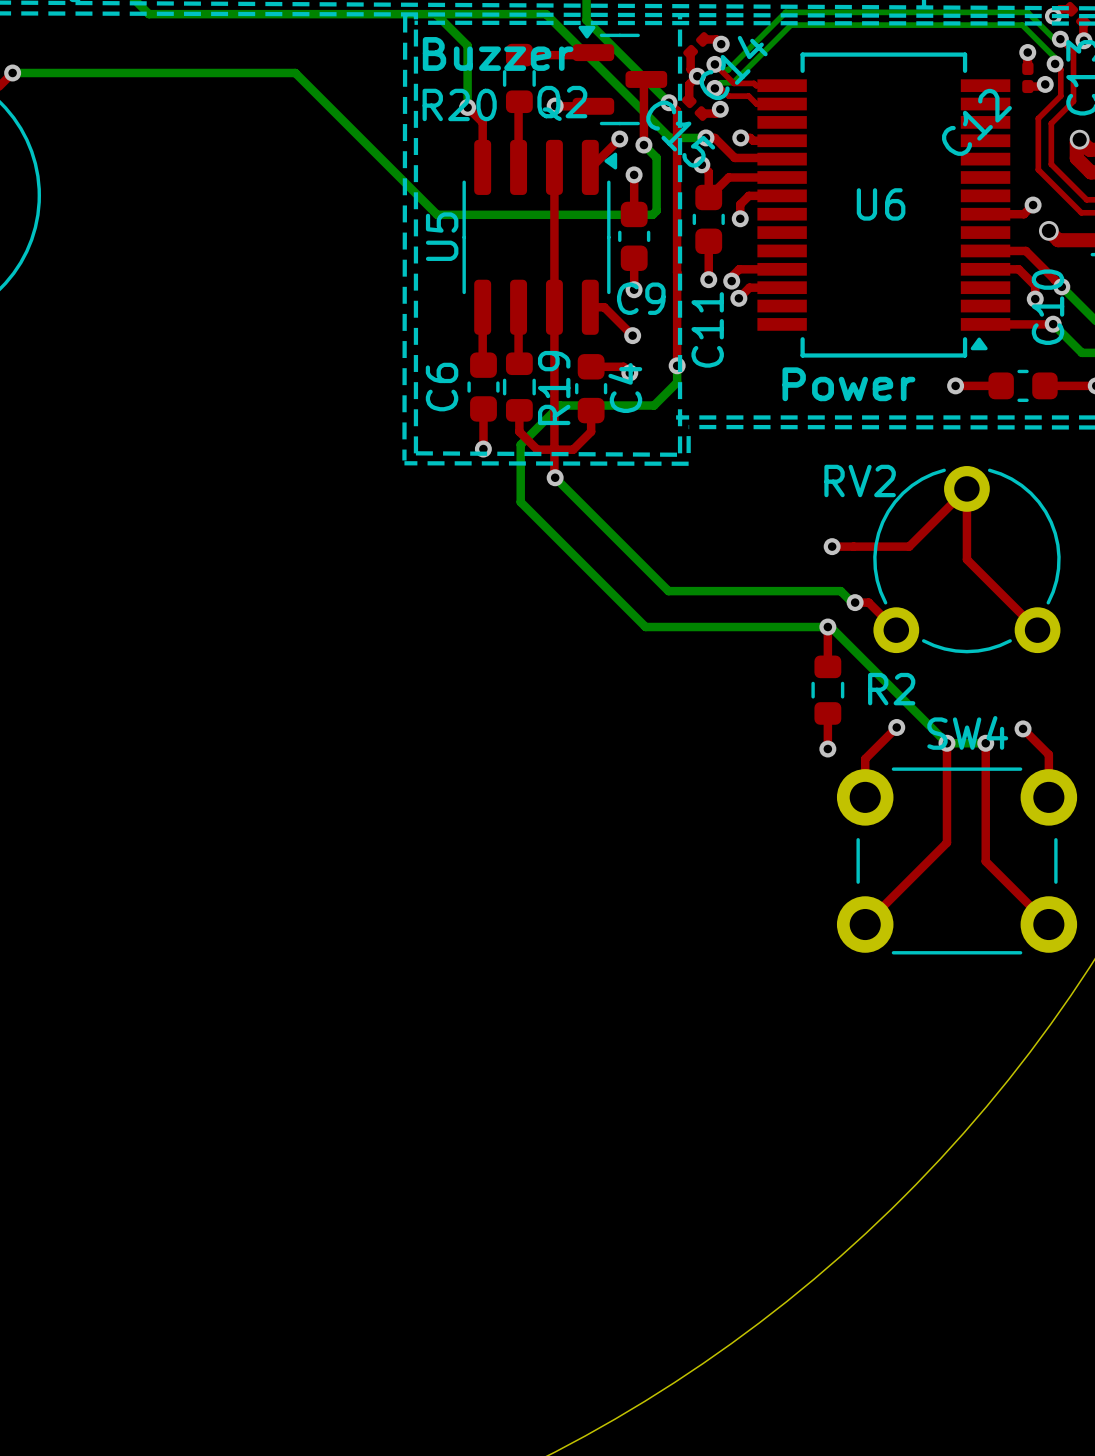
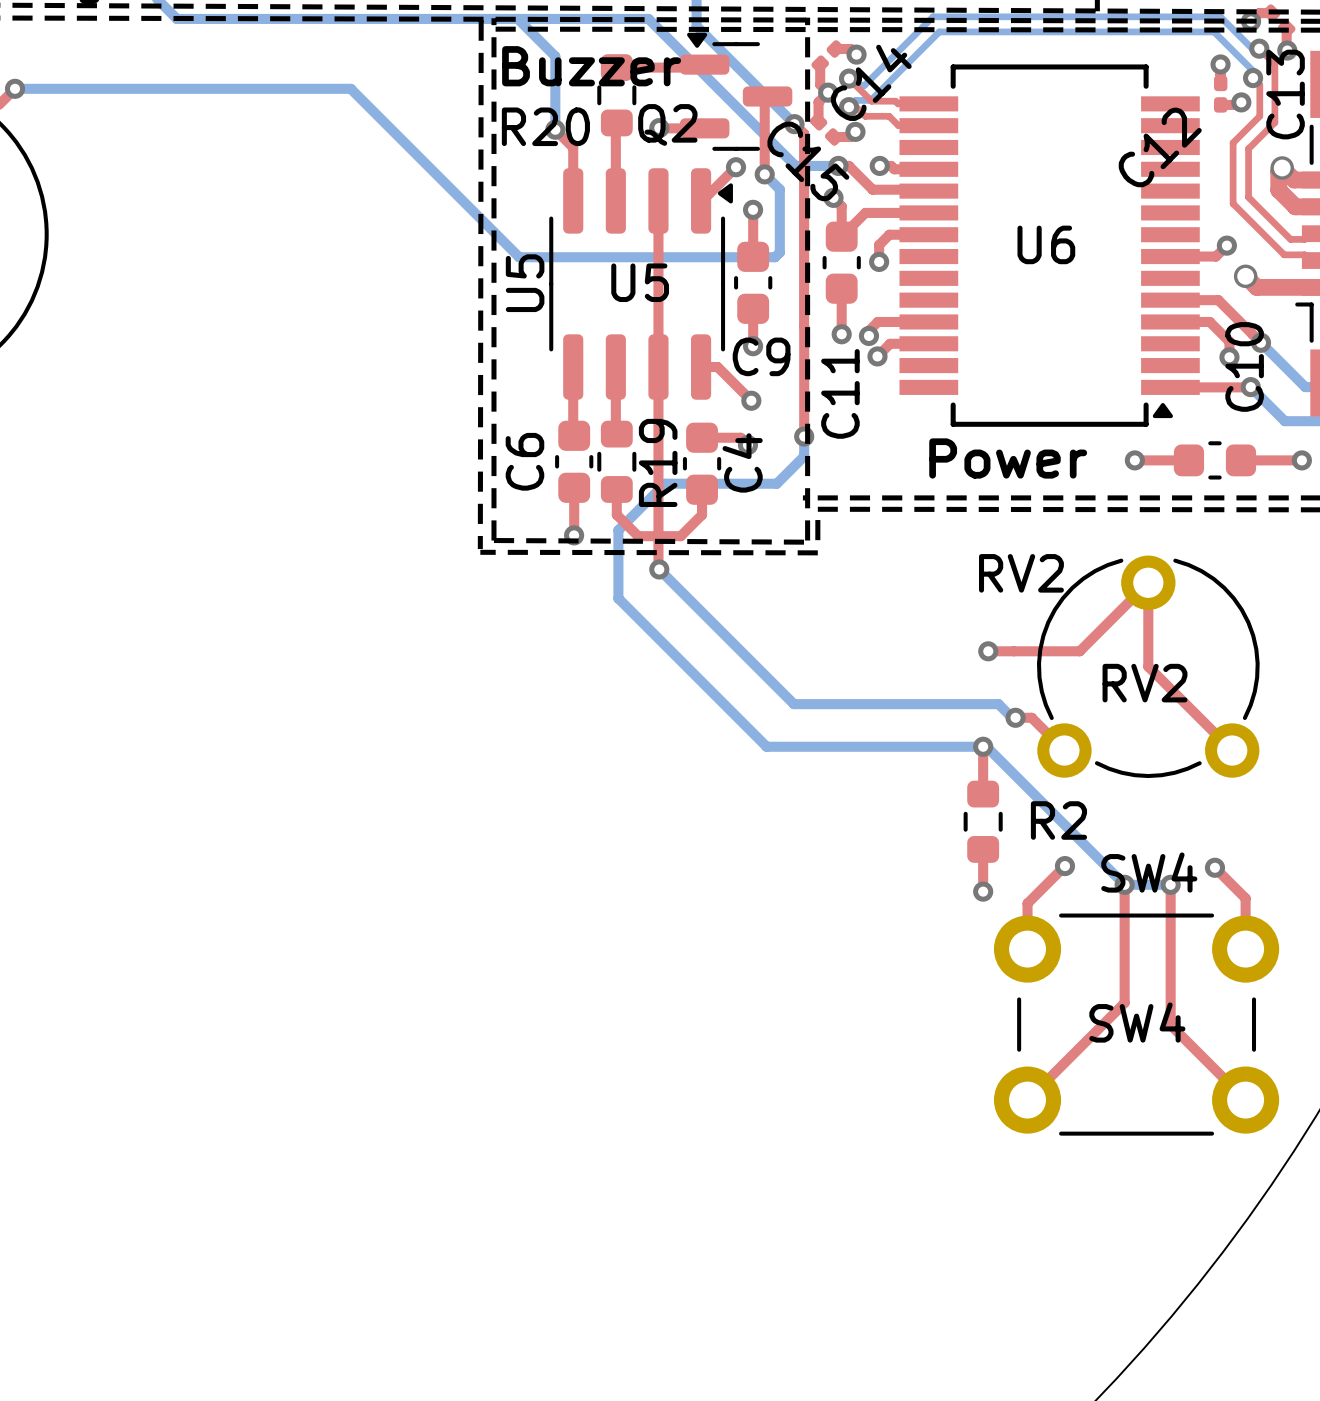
text: none -> U5 (640, 282)
text: none -> RV2 (1145, 683)
text: none -> SW4 (1137, 1022)

